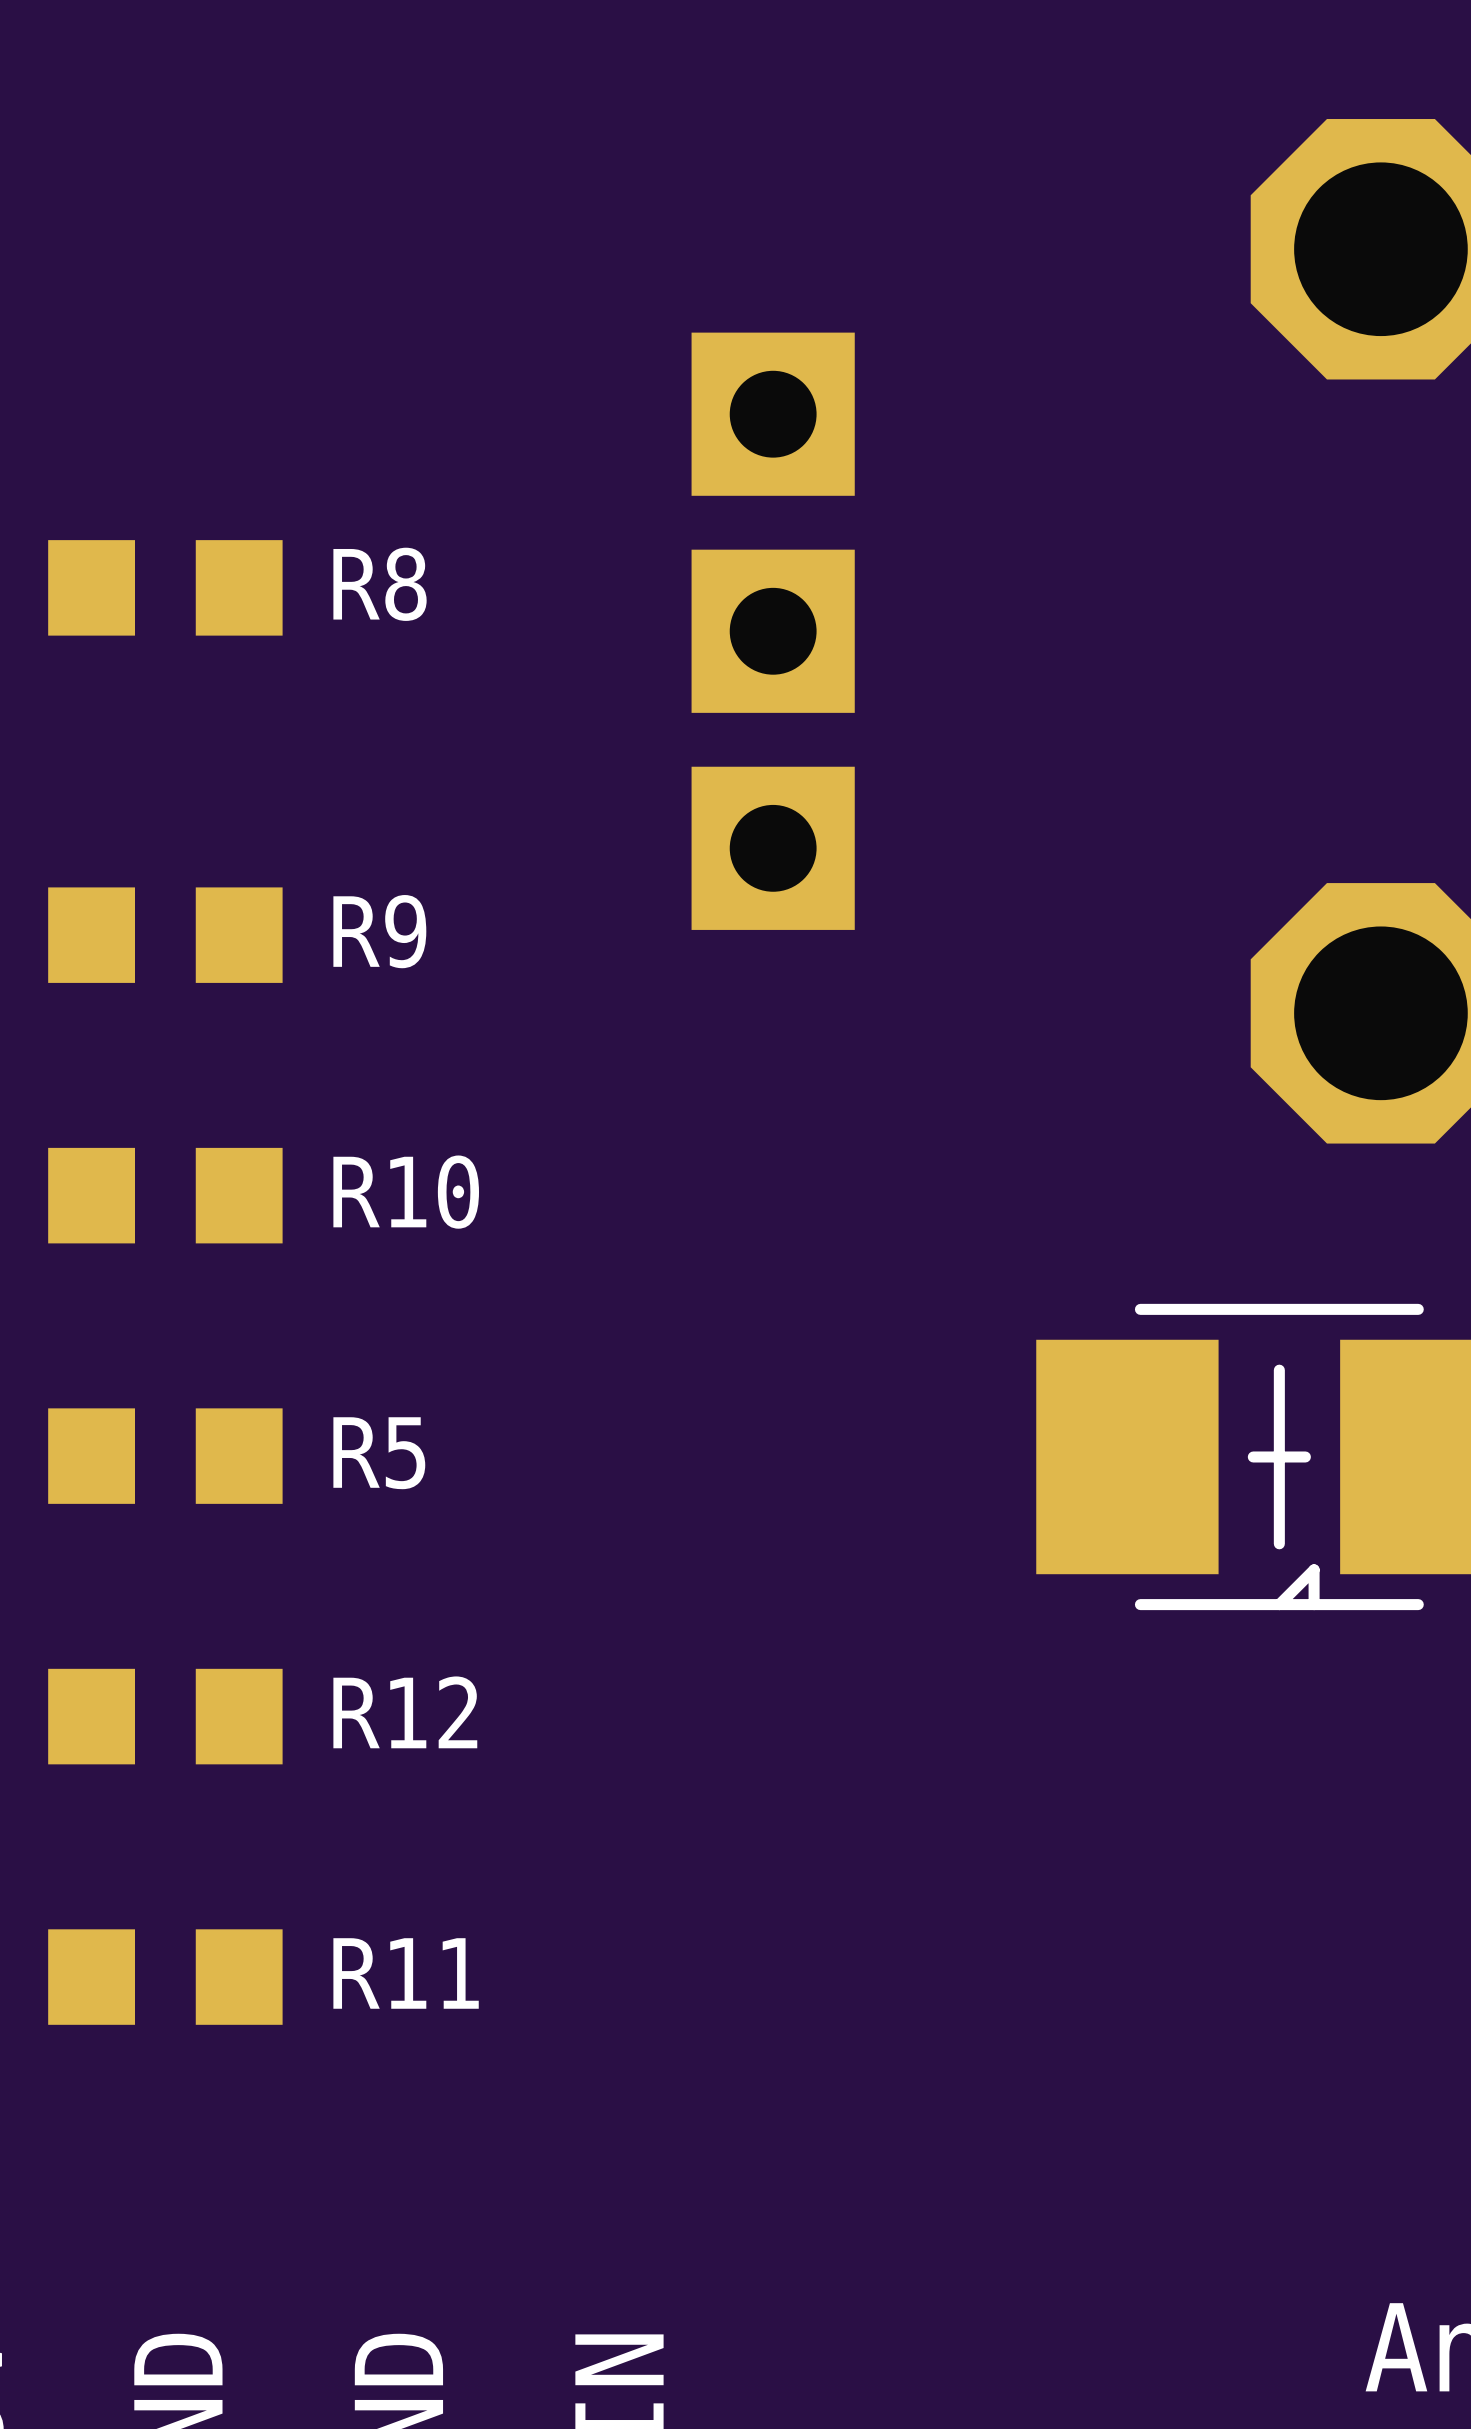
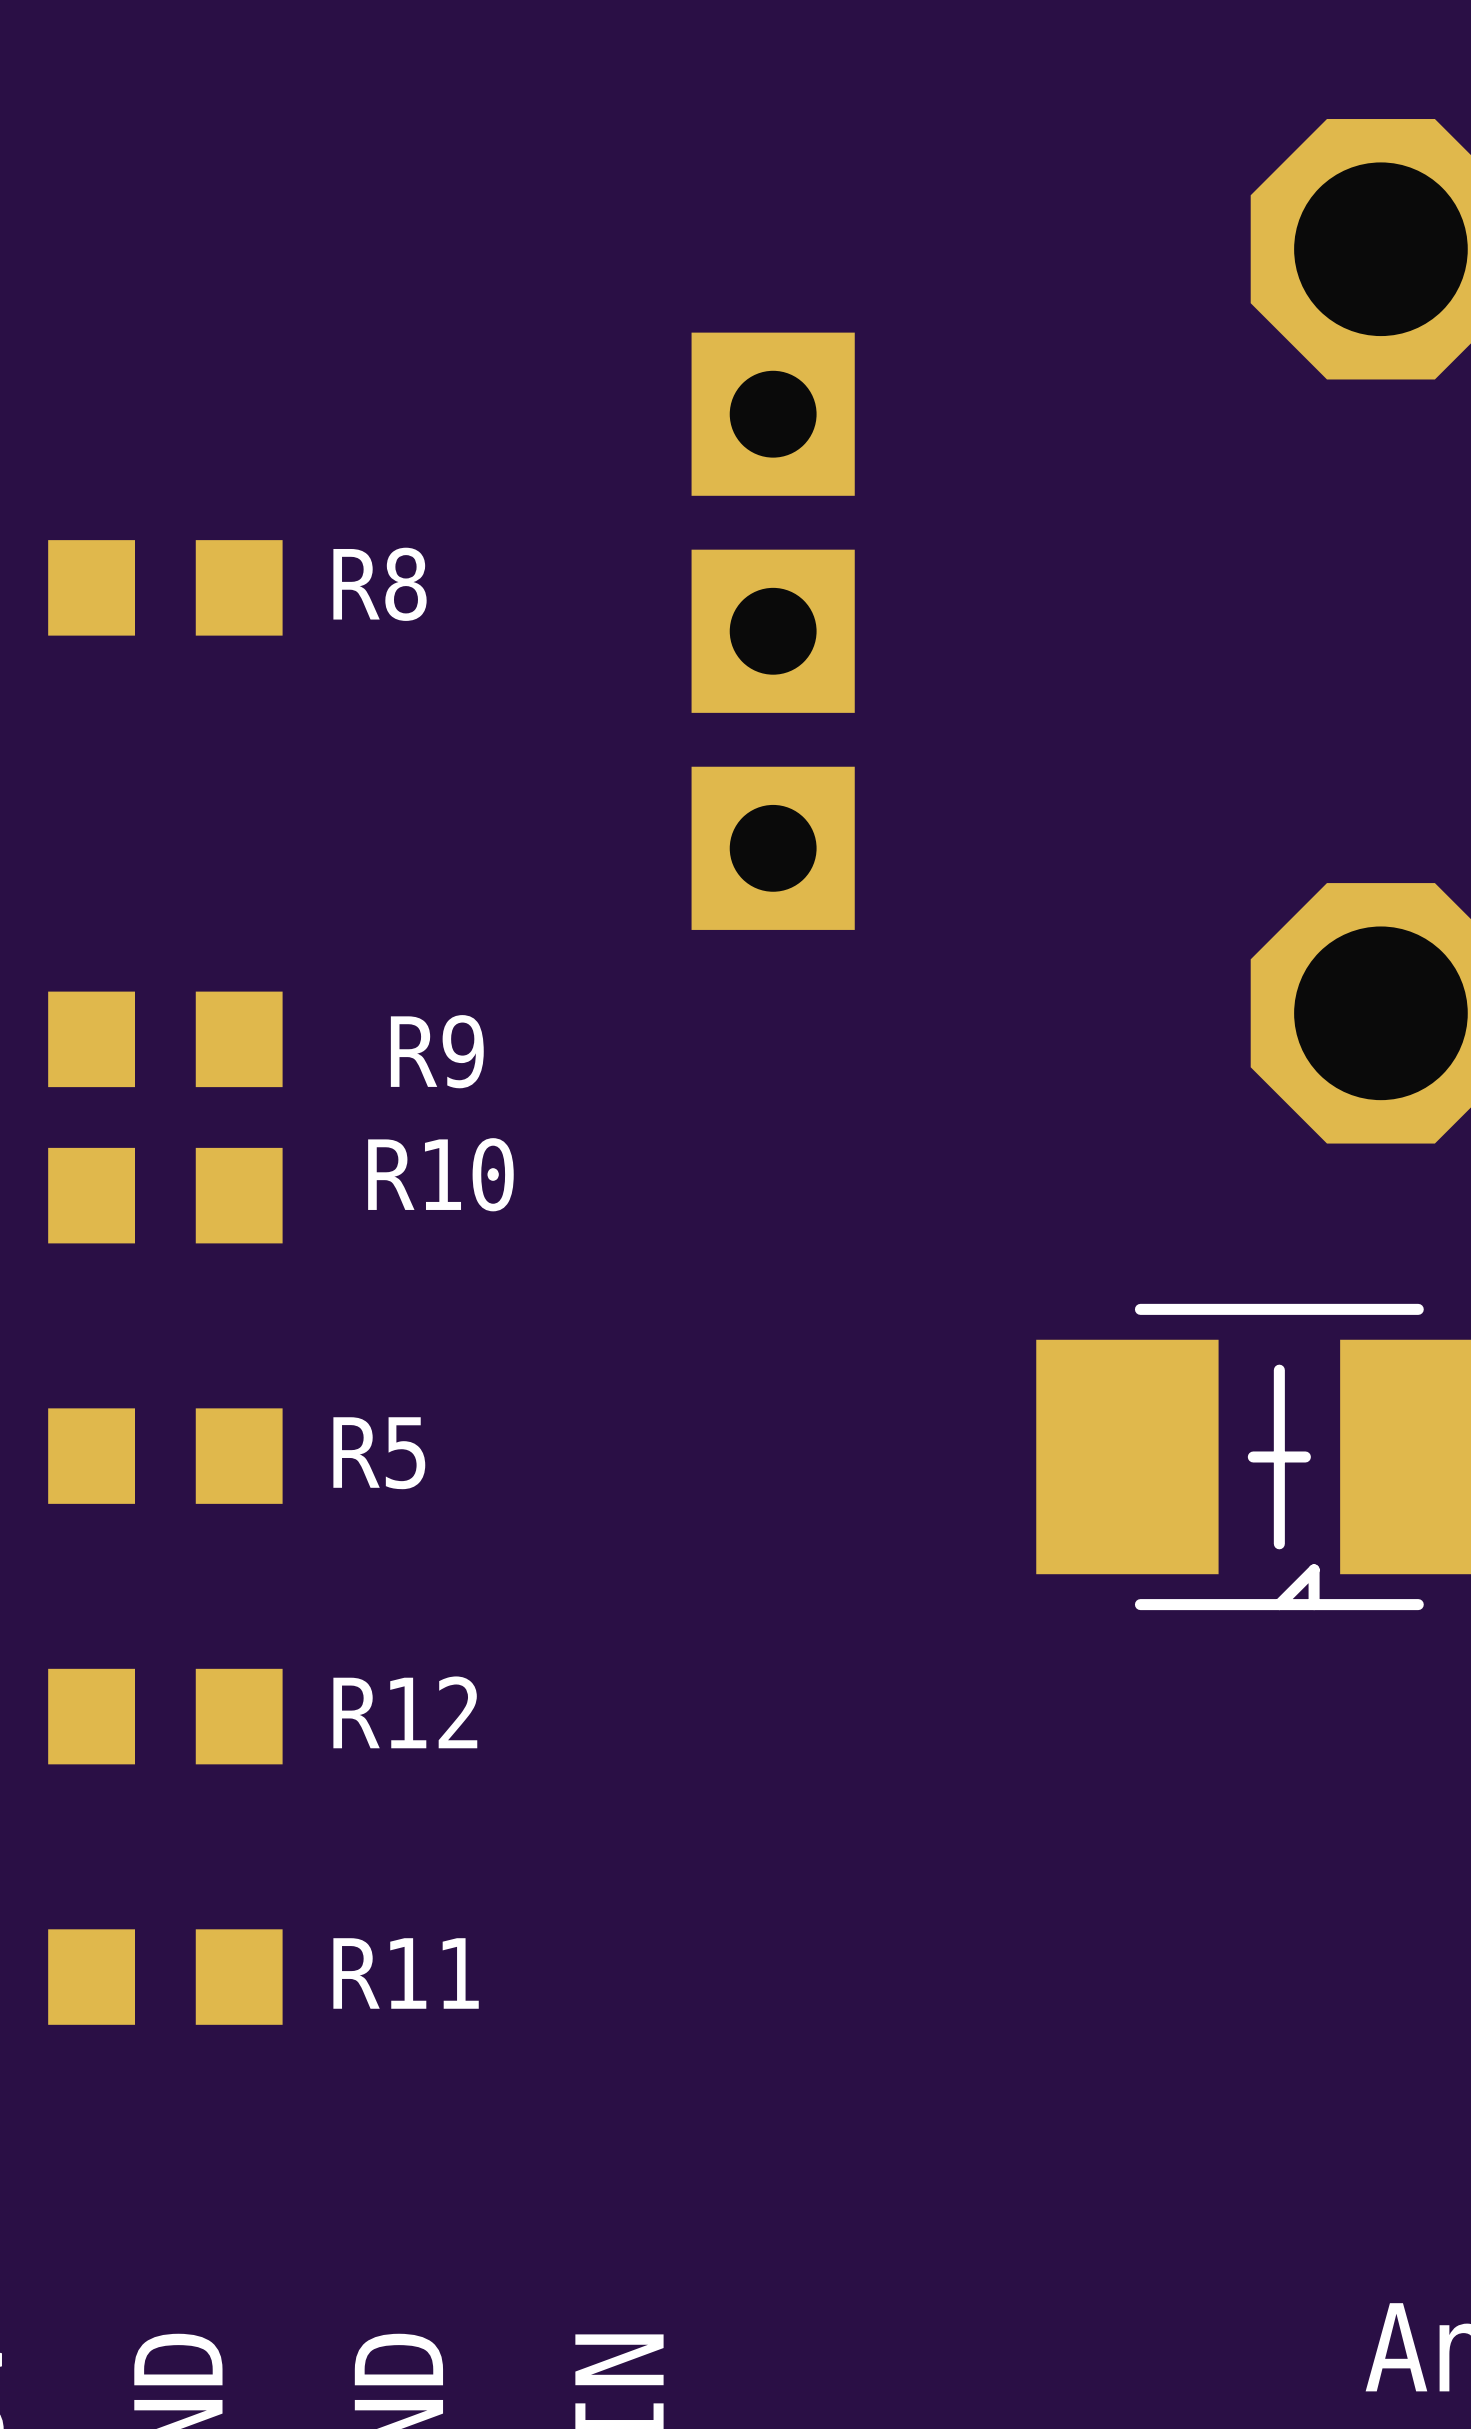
R9 name position: R9 (379, 931) -> R9 (437, 1051)
R9 position: (165, 935) -> (165, 1039)
R10 name position: R10 (406, 1192) -> R10 (440, 1174)

